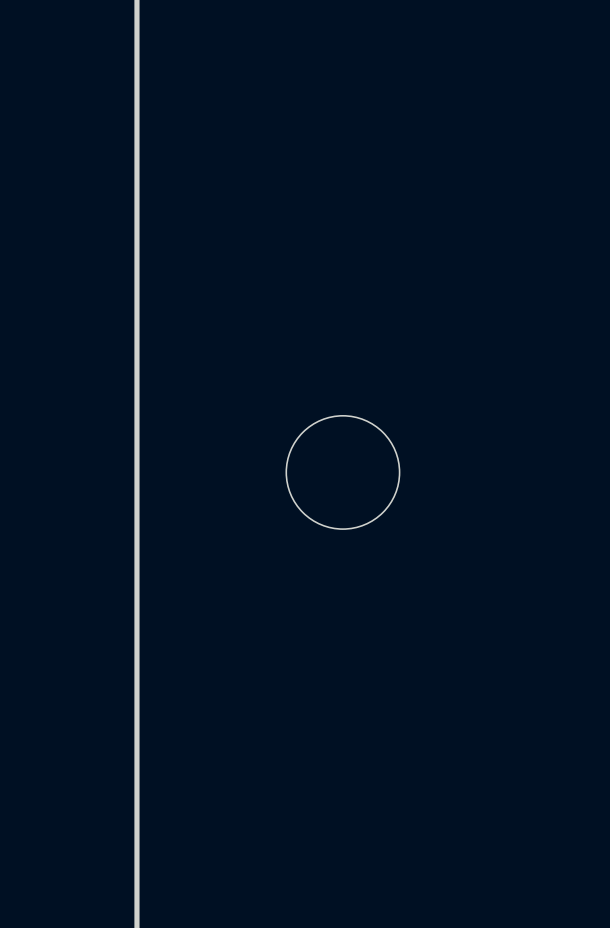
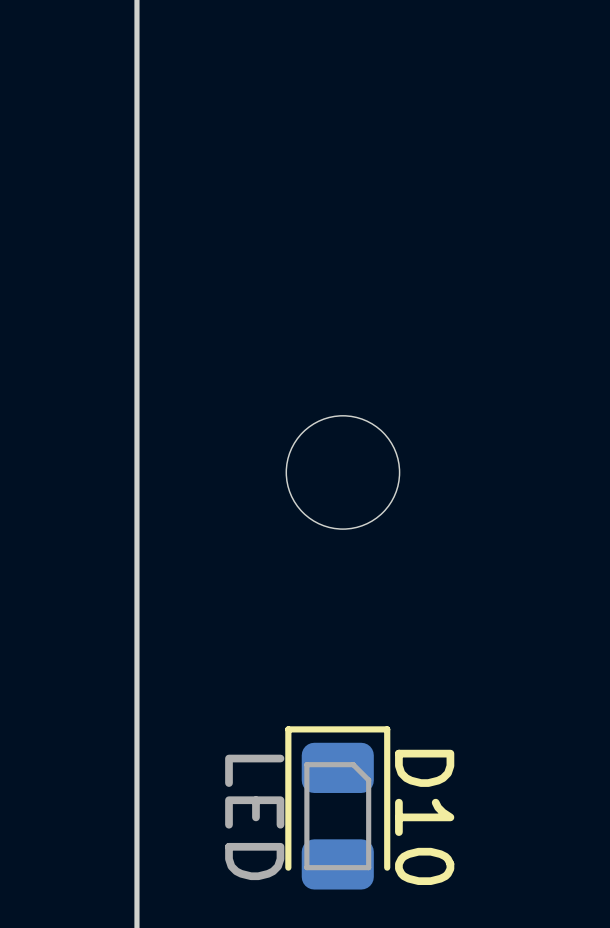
D10: none -> LED (337, 807)

